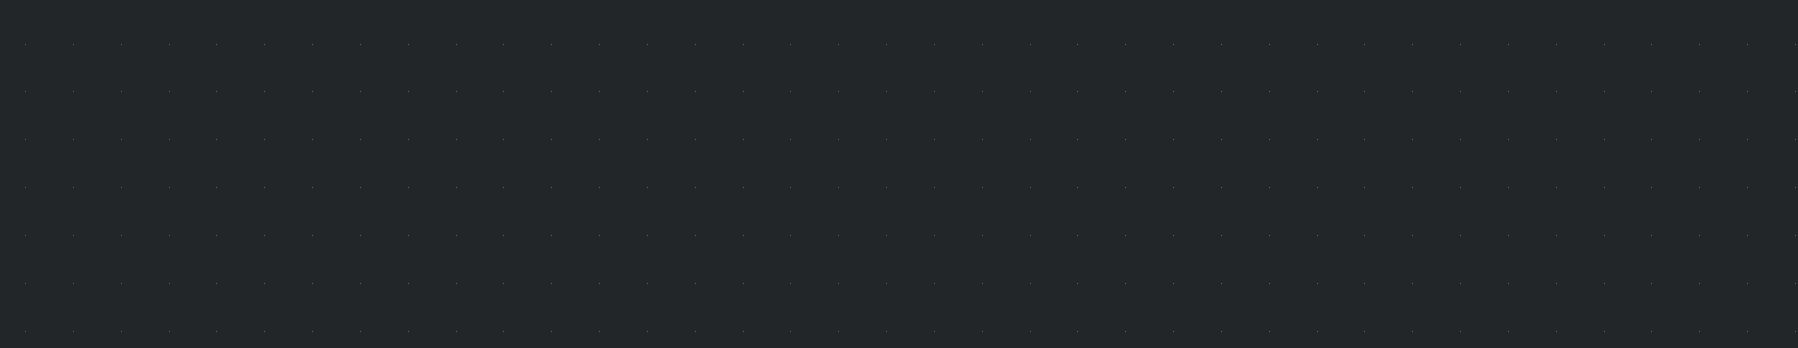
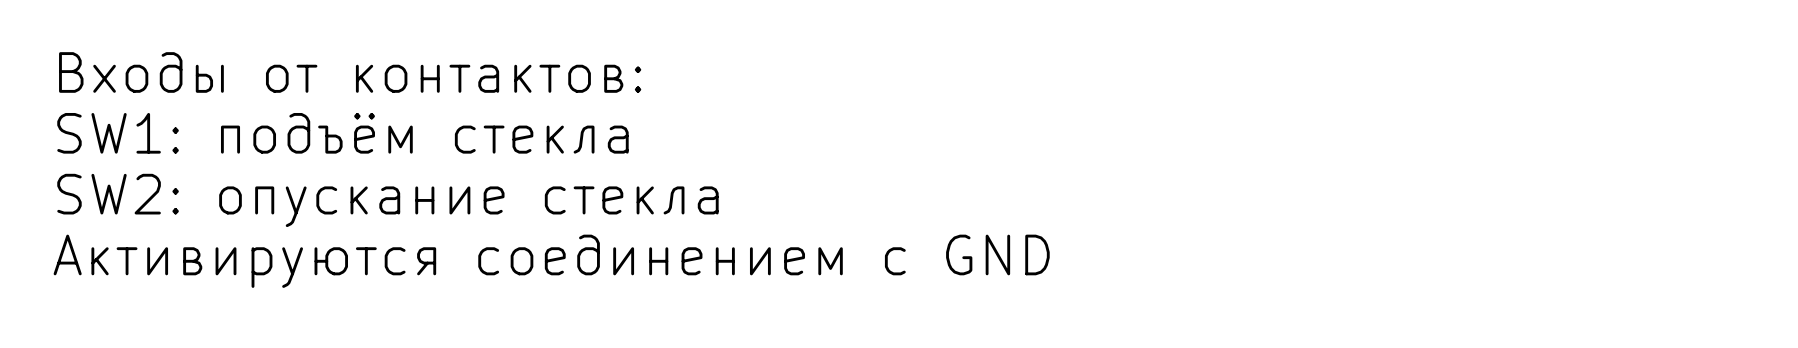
text: none -> Входы от контактов: (350, 72)
text: none -> SW1: подъём стекла (342, 133)
text: none -> SW2: опускание стекла (387, 200)
text: none -> Активируются соединением с GND (551, 261)

